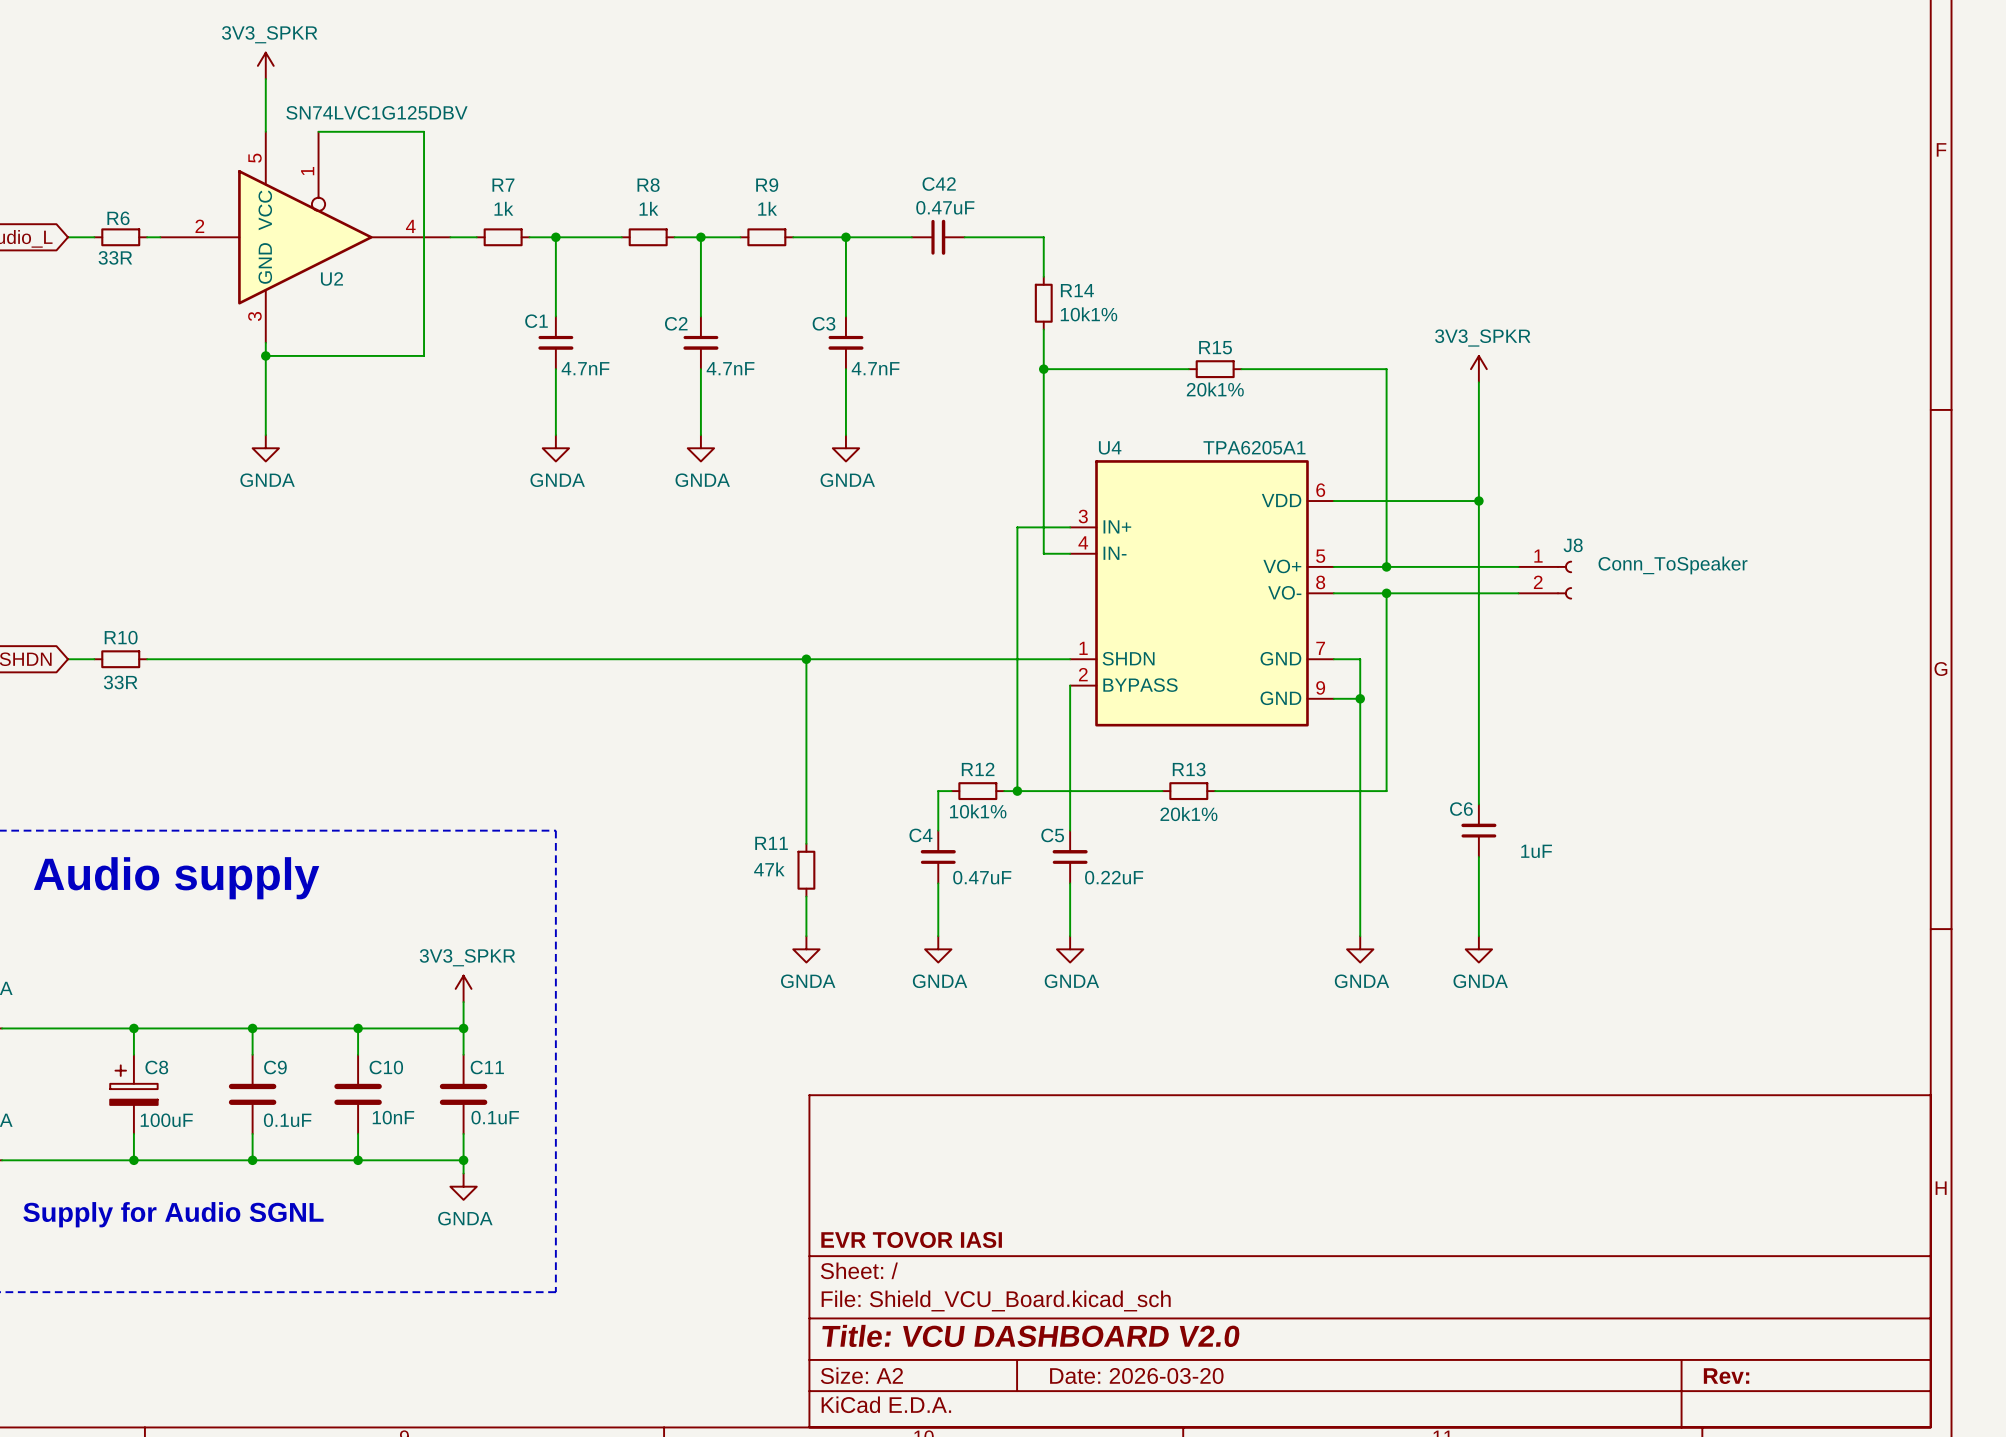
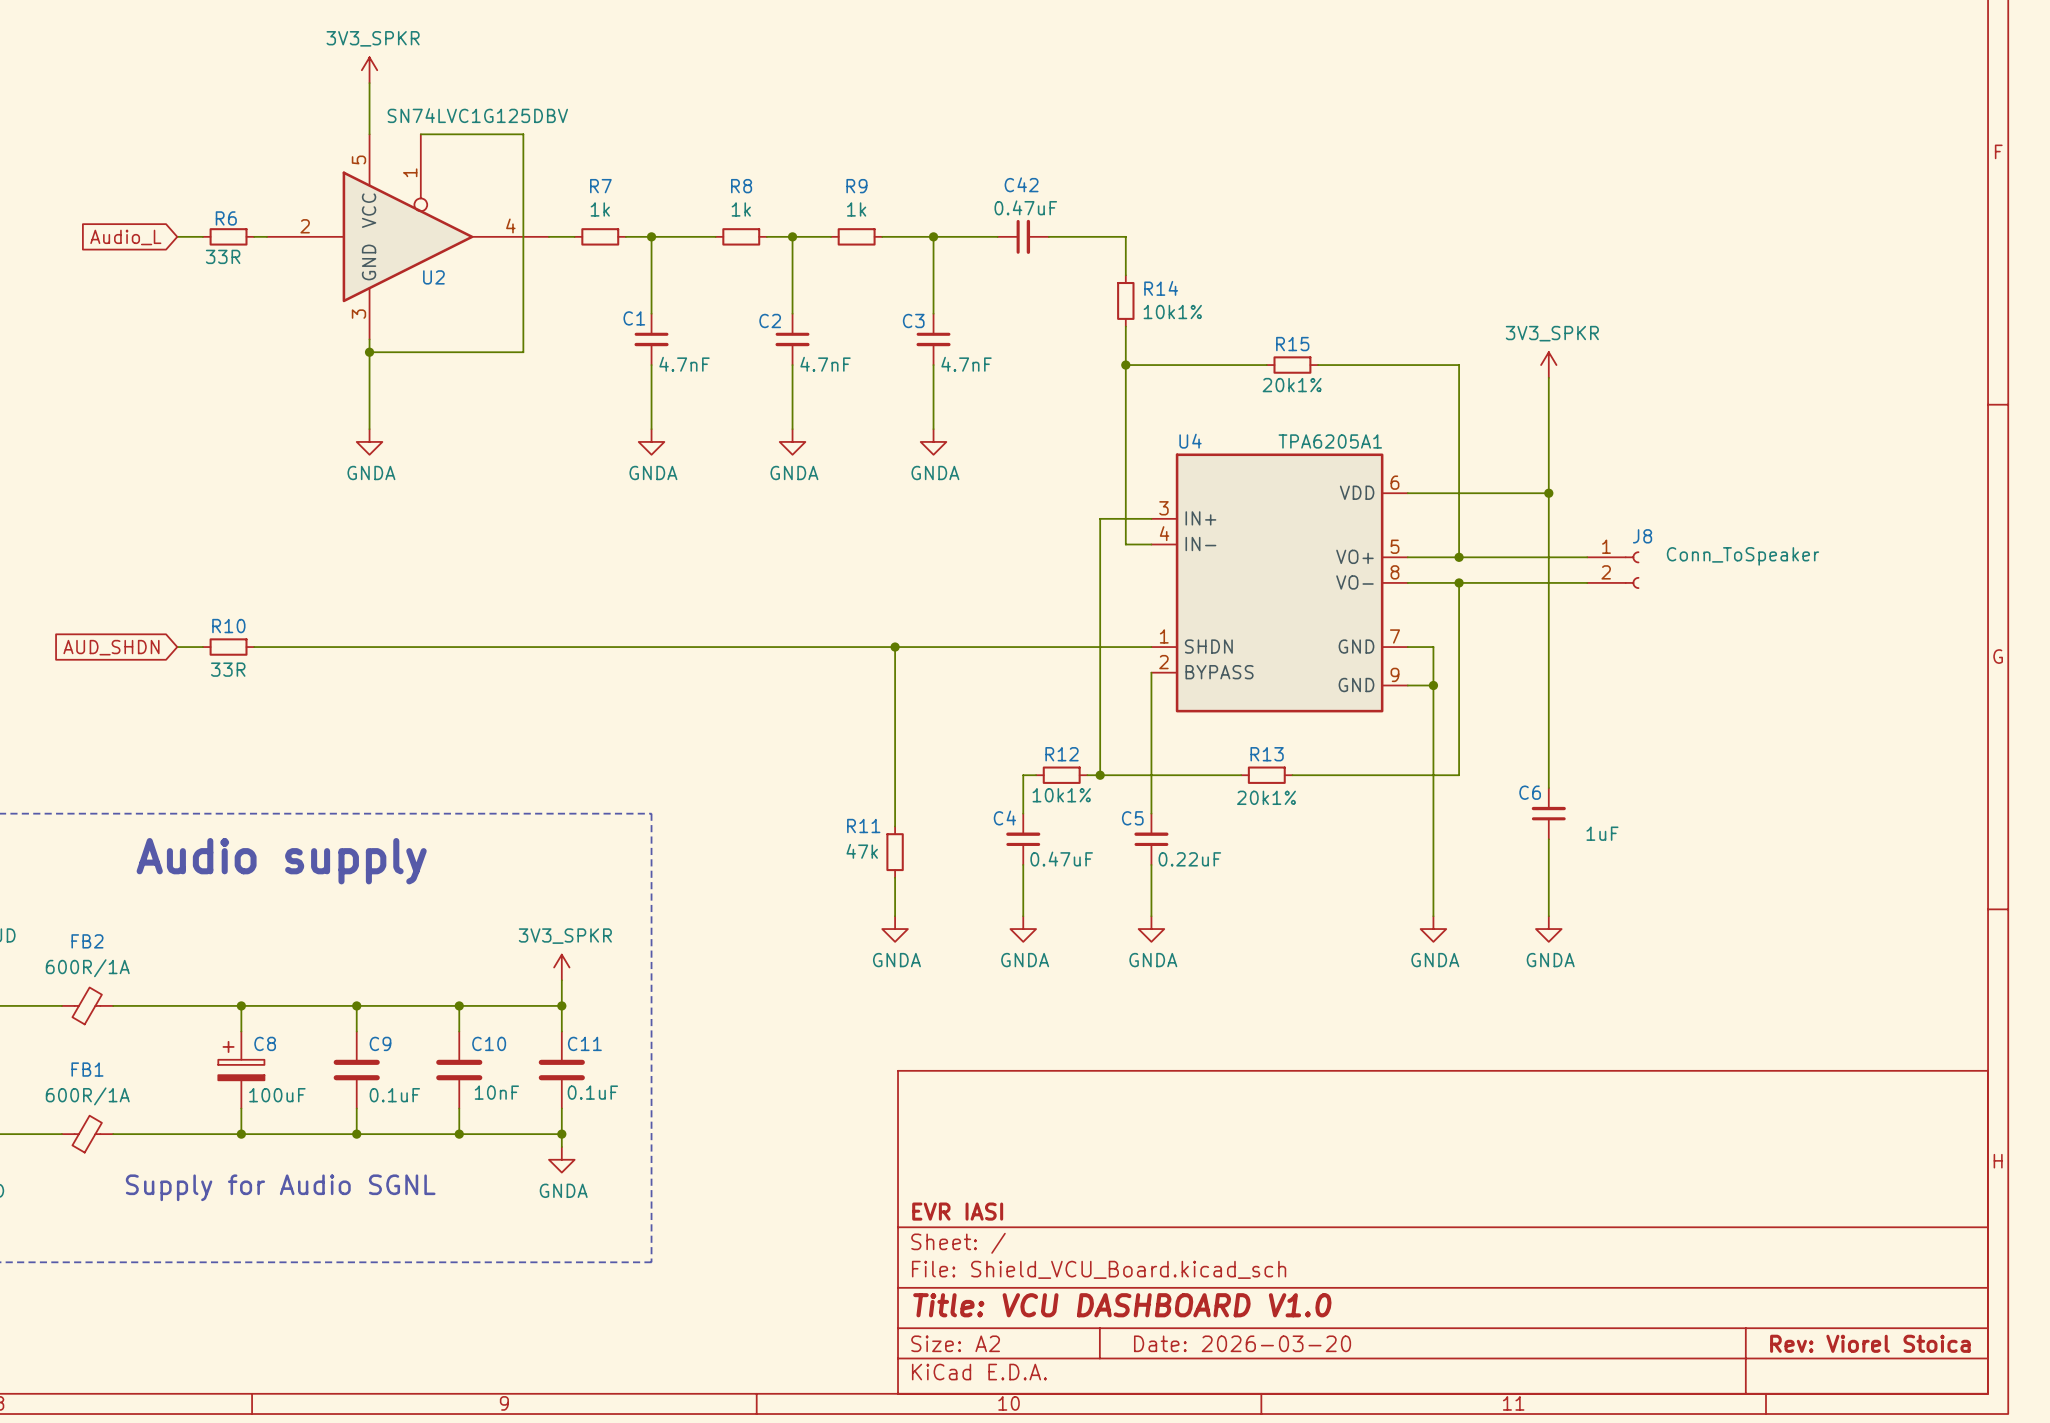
title block: EVR TOVOR IASI (911, 1239) -> EVR IASI (957, 1211)
title block: Title: VCU DASHBOARD V2.0 (1031, 1335) -> Title: VCU DASHBOARD V1.0 (1122, 1305)
title block: Rev: (1726, 1376) -> Rev: Viorel Stoica (1870, 1343)

